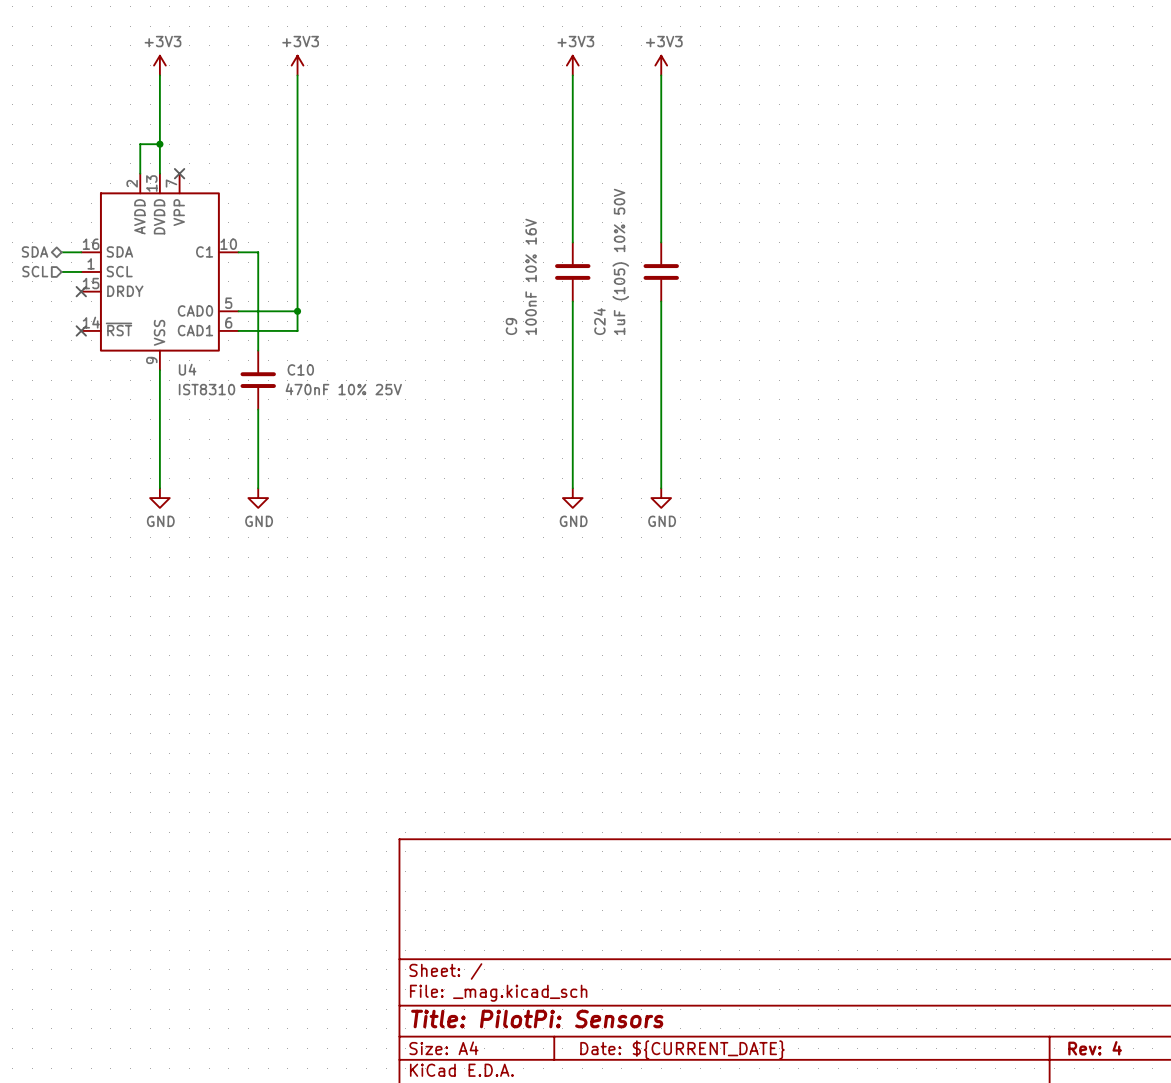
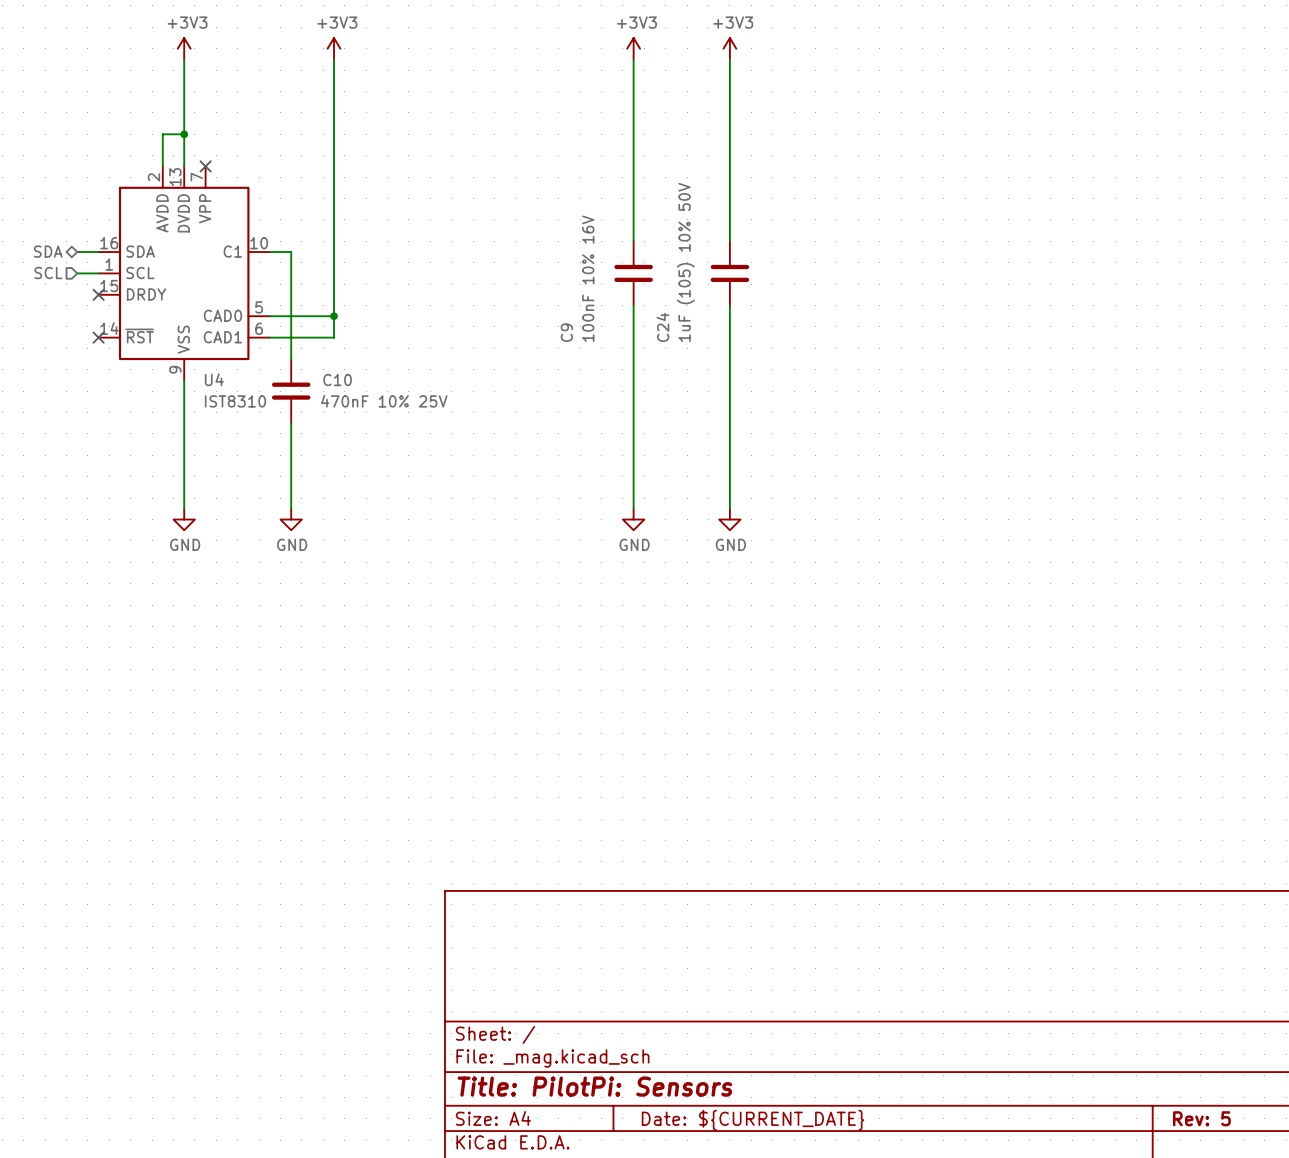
title block: Rev: 4 (1095, 1048) -> Rev: 5 (1201, 1118)

